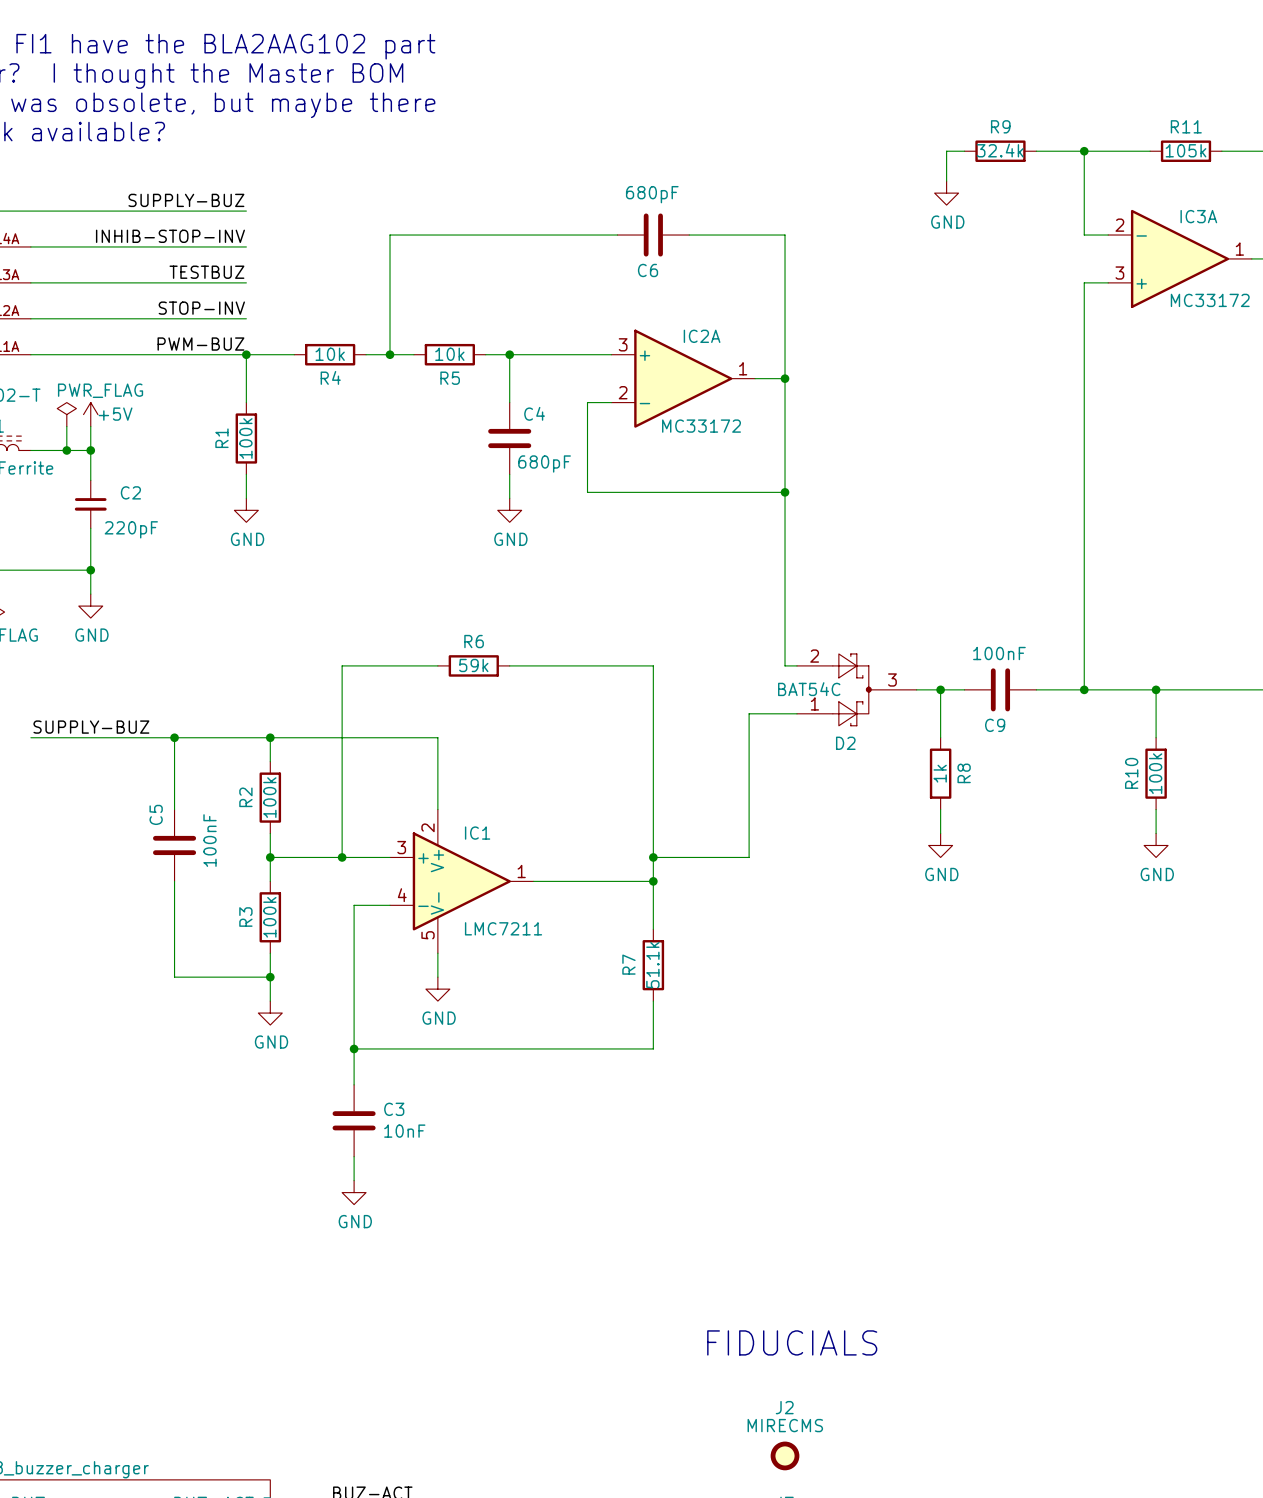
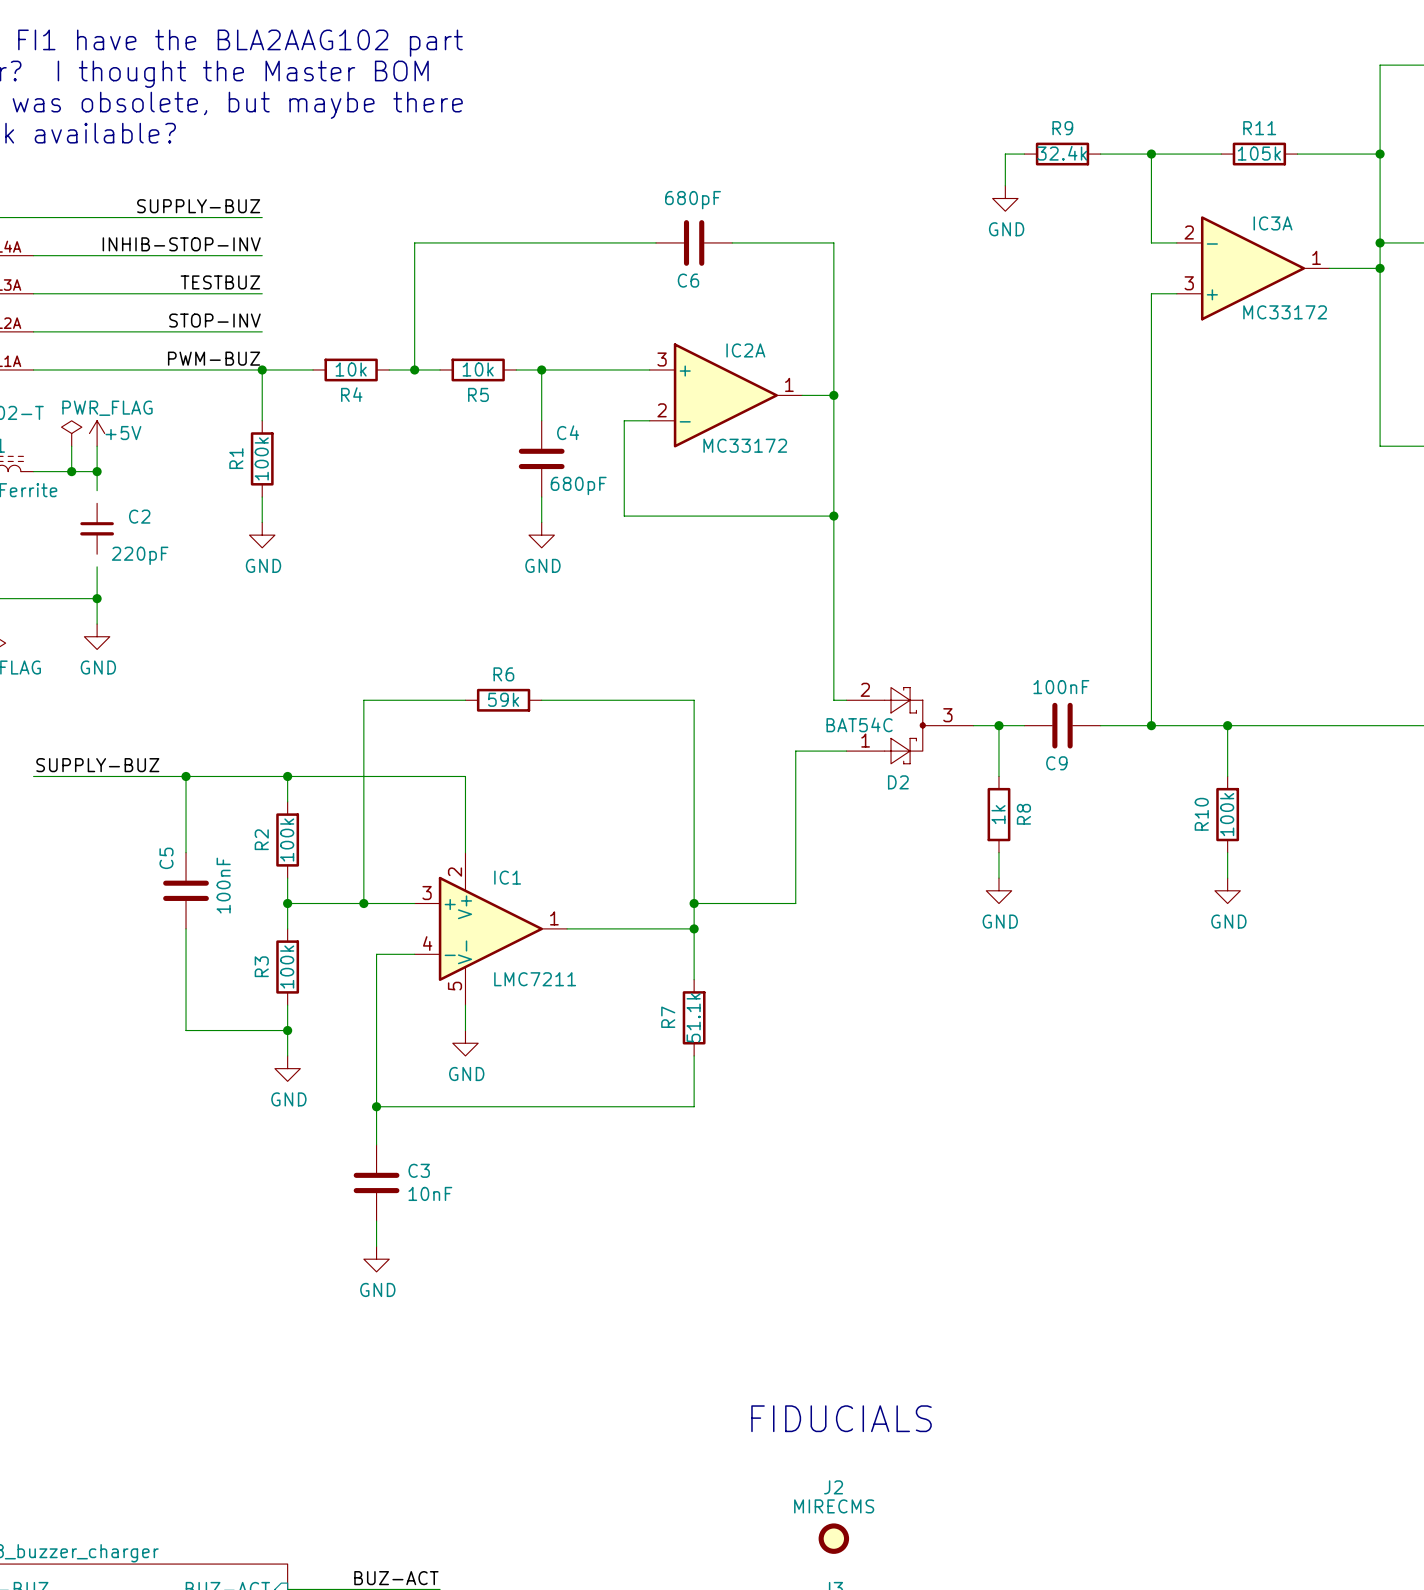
wire: (90, 468) (90, 480) -> none
wire: (90, 528) (90, 540) -> none

